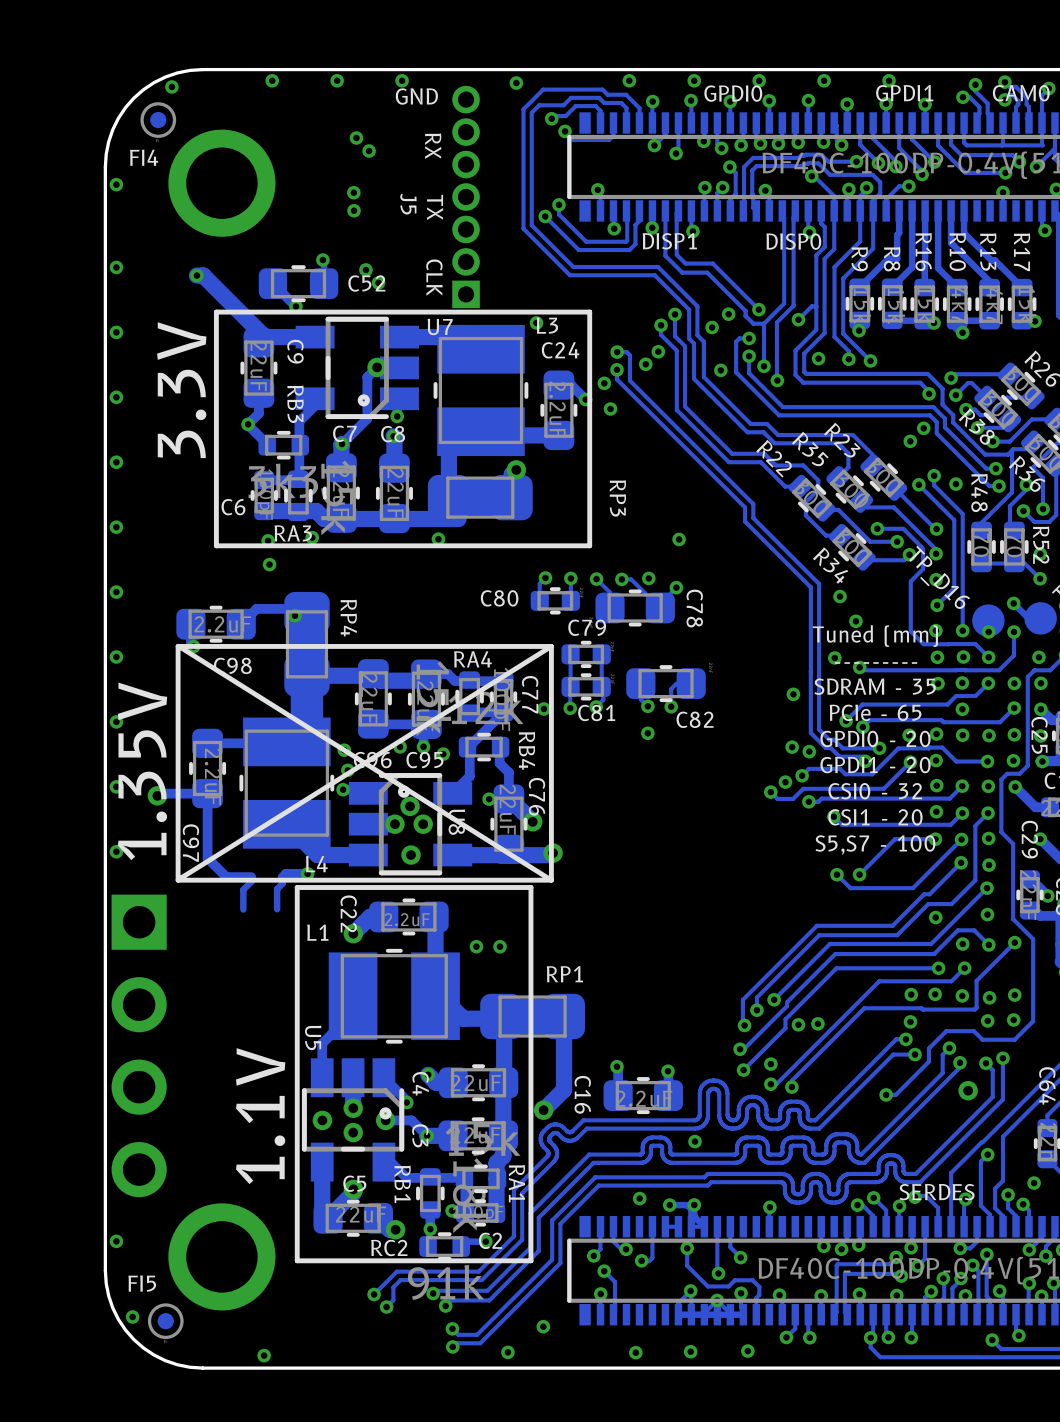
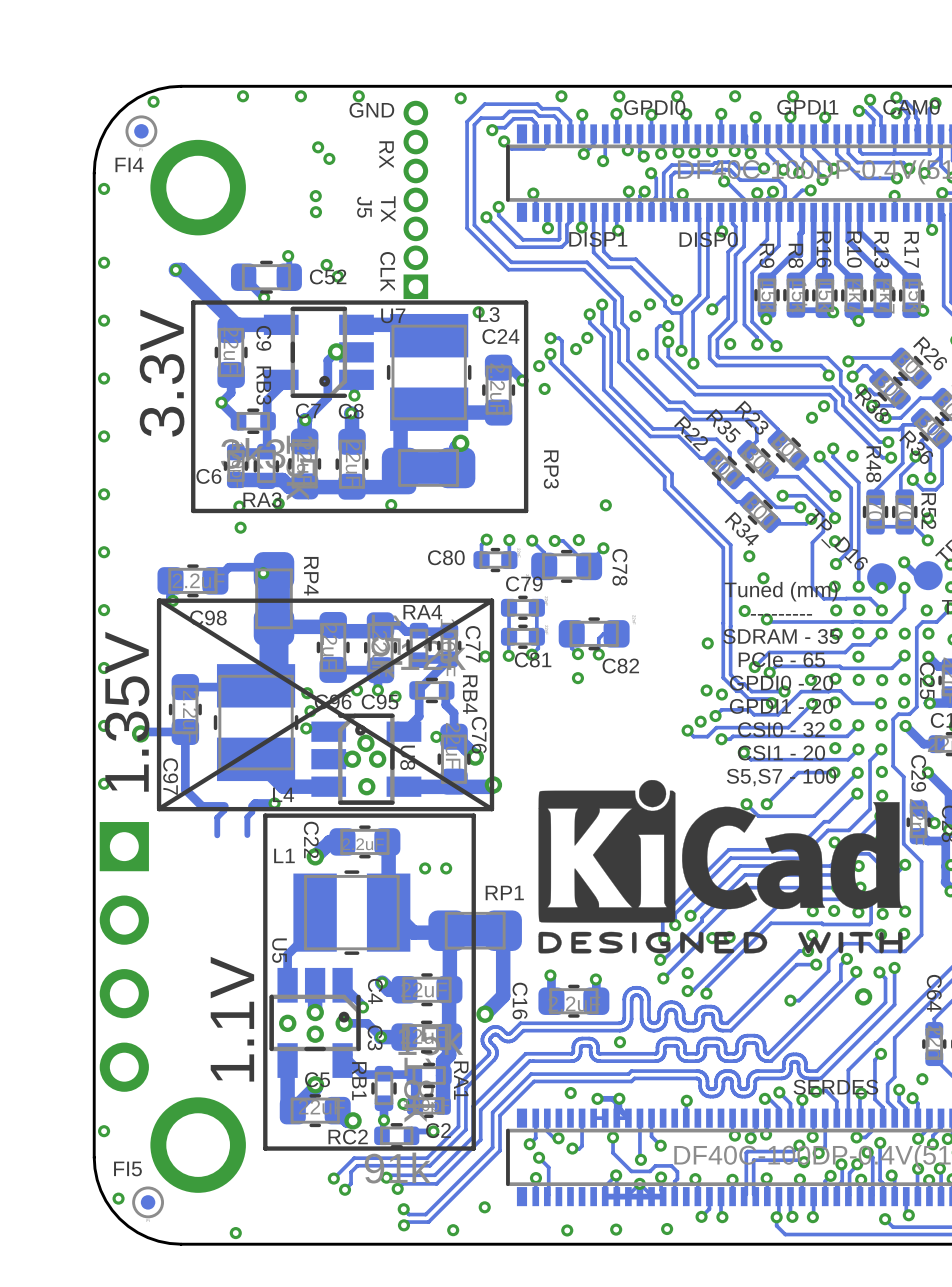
drawing: none -> [538, 779, 903, 954]

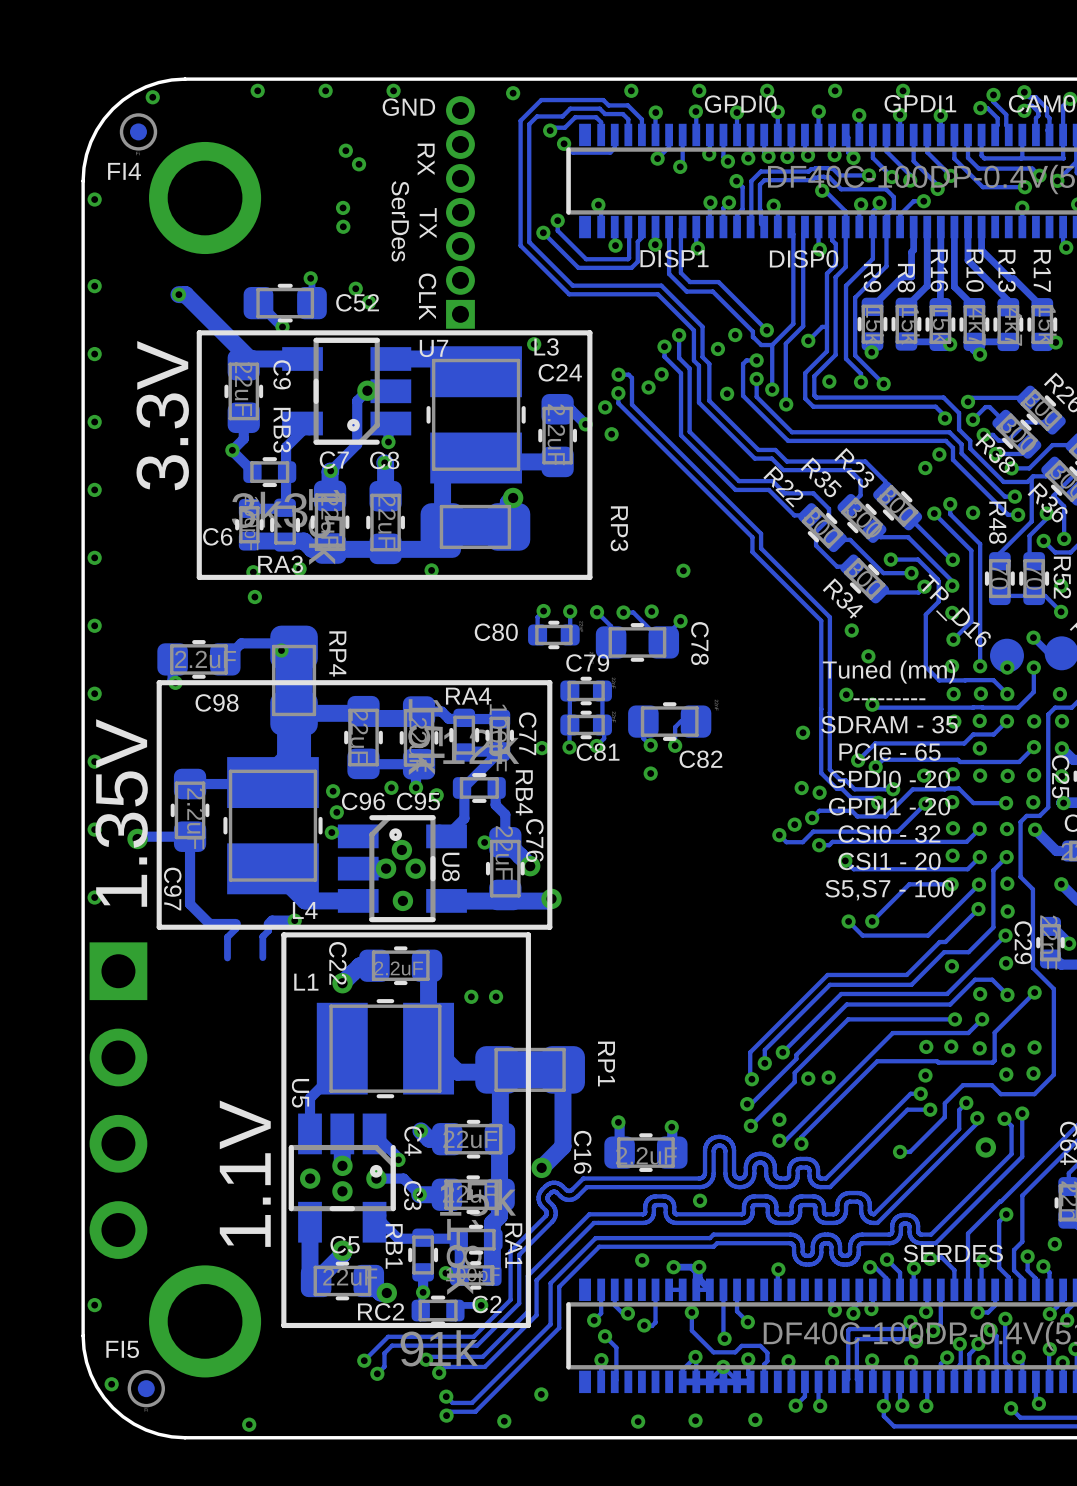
J5 name: J5 (364, 207) -> SerDes (400, 221)
line: (159, 600) (491, 808) -> none
line: (491, 600) (159, 808) -> none
C29 name position: C29 (918, 773) -> C29 (1023, 942)
drawing: [538, 779, 903, 954] -> none
RP1 name rotation: 0° (504, 892) -> 90° clockwise (606, 1064)

